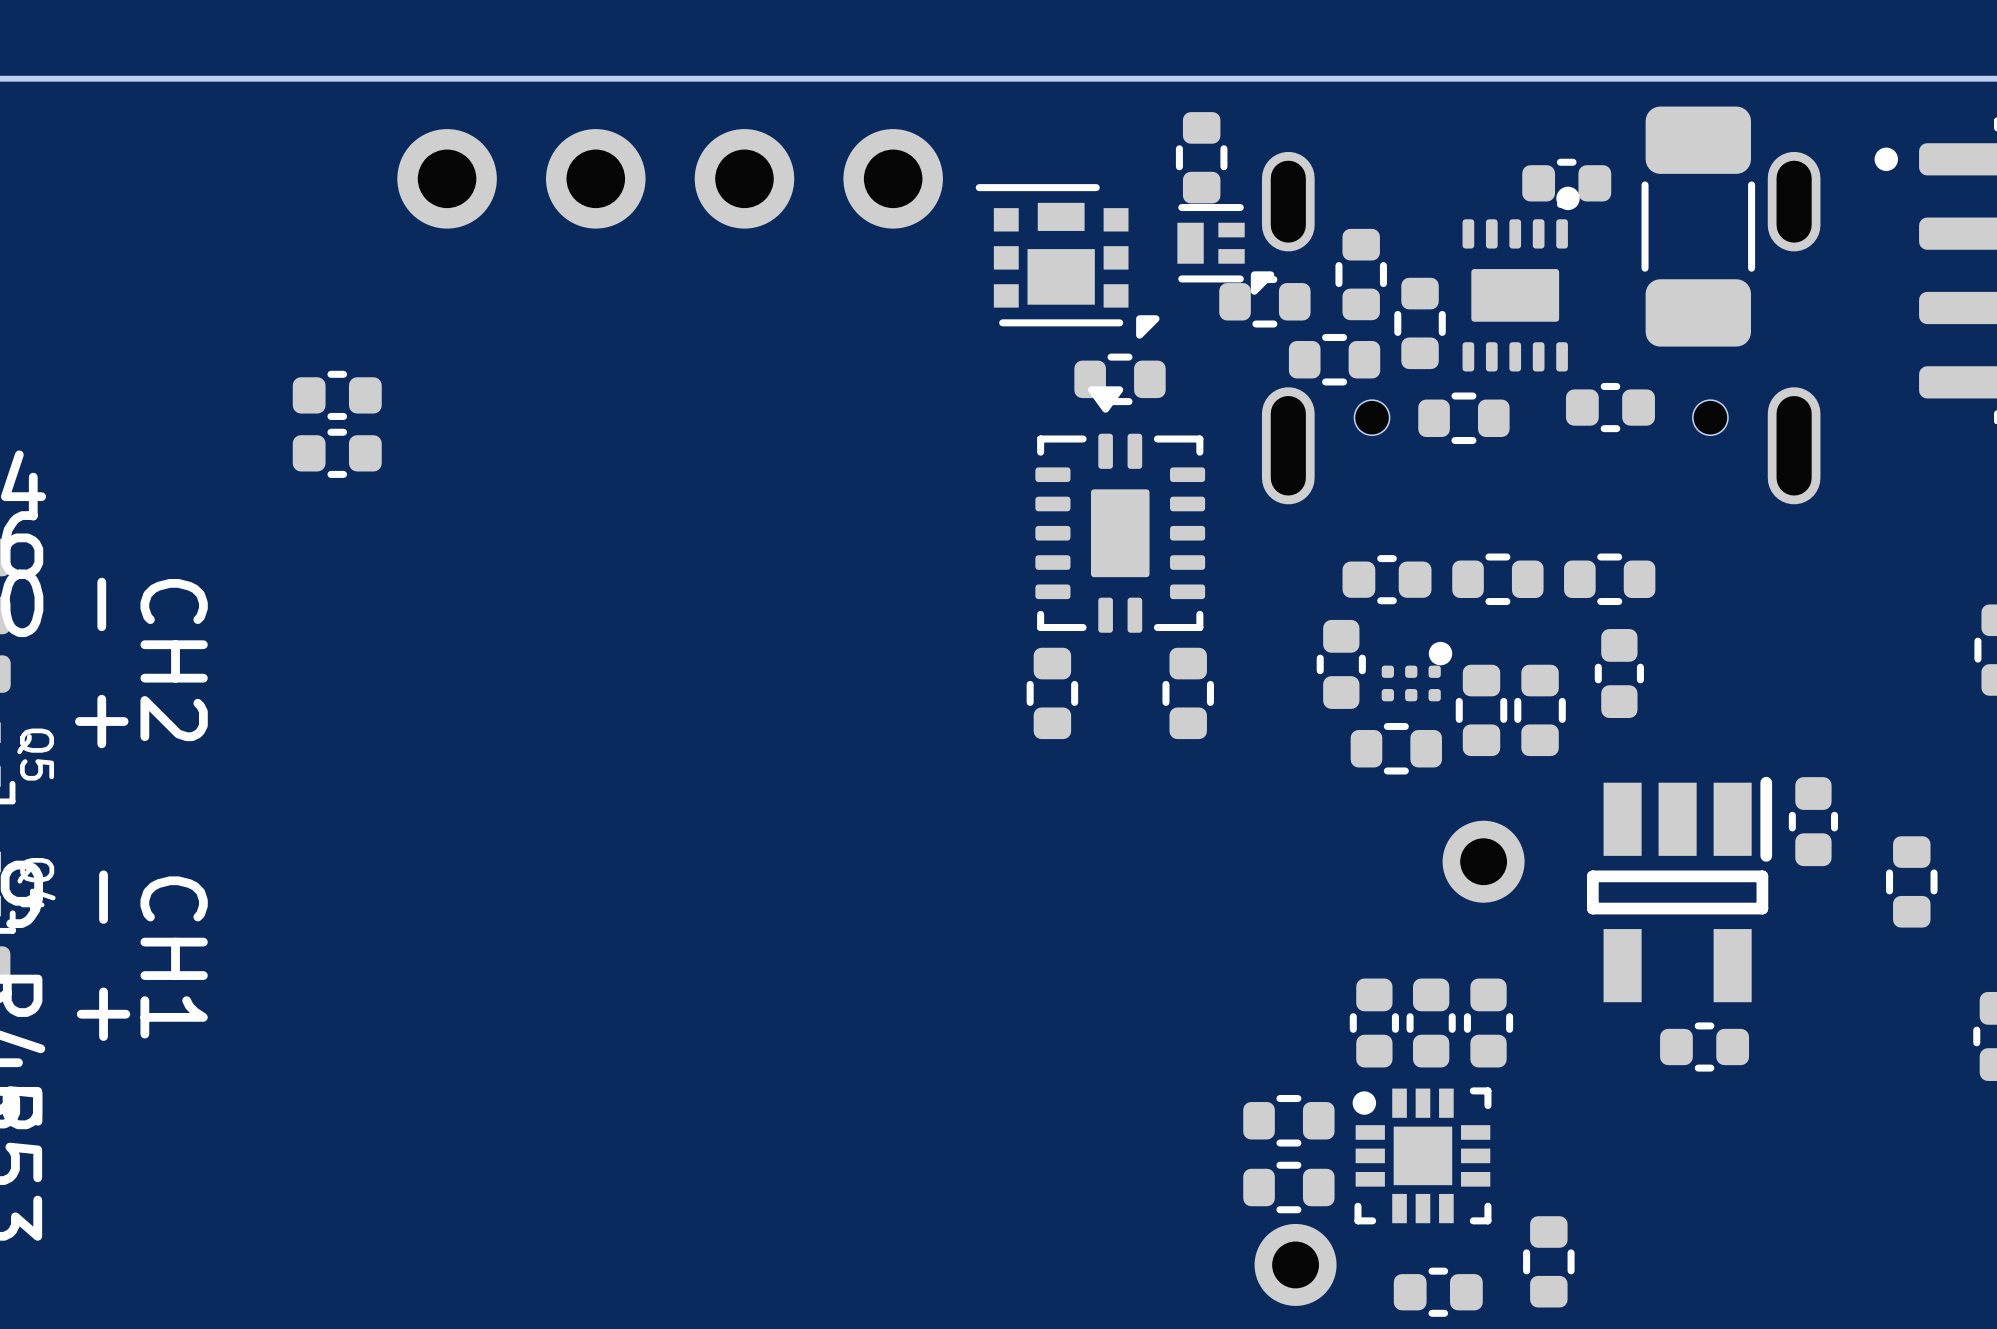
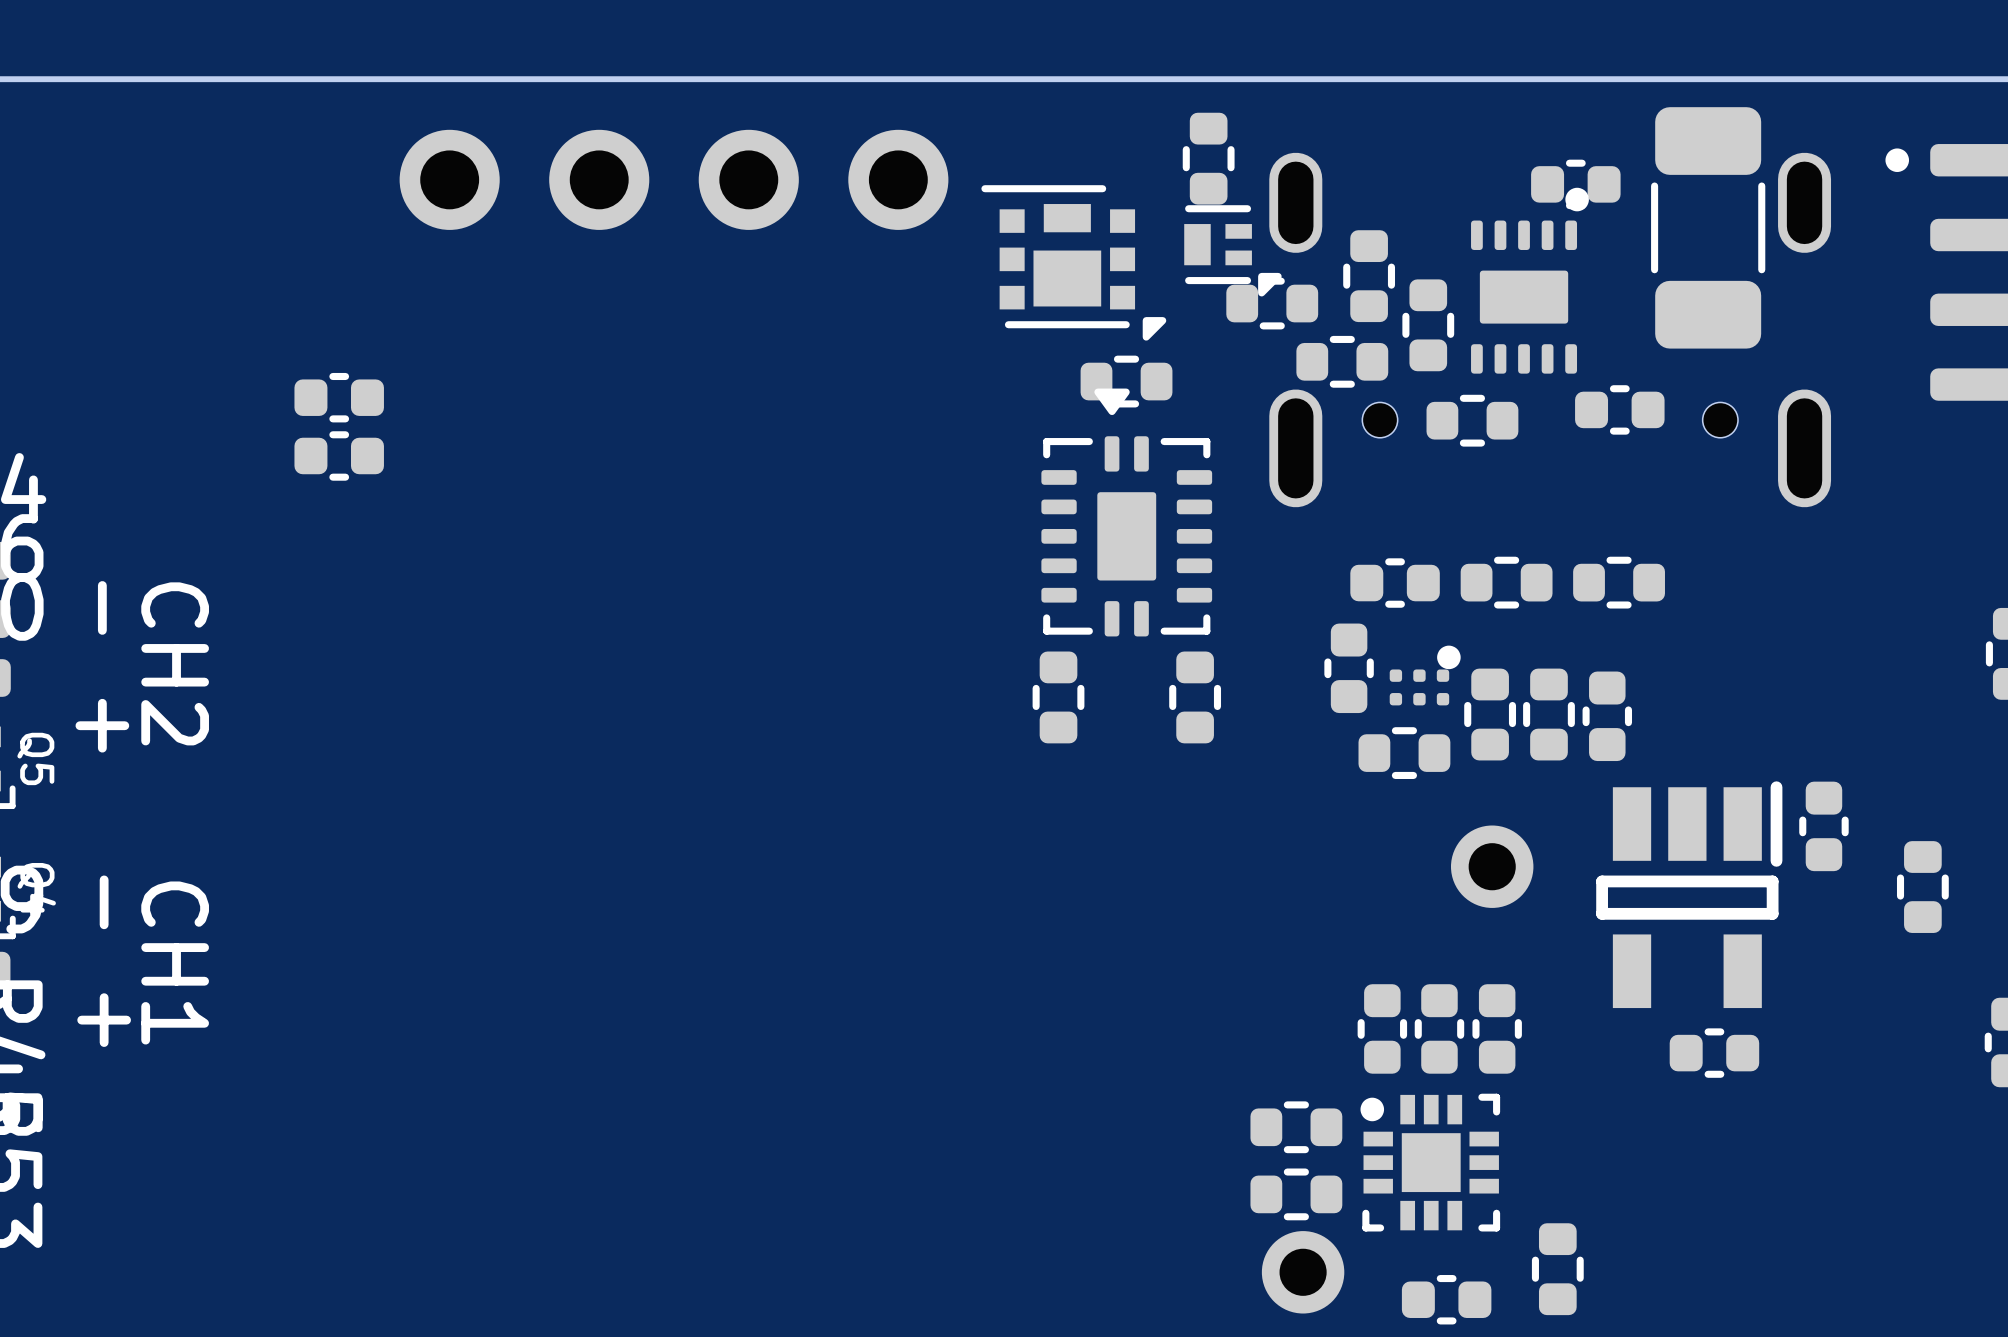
part position: (1619, 673) -> (1607, 716)

